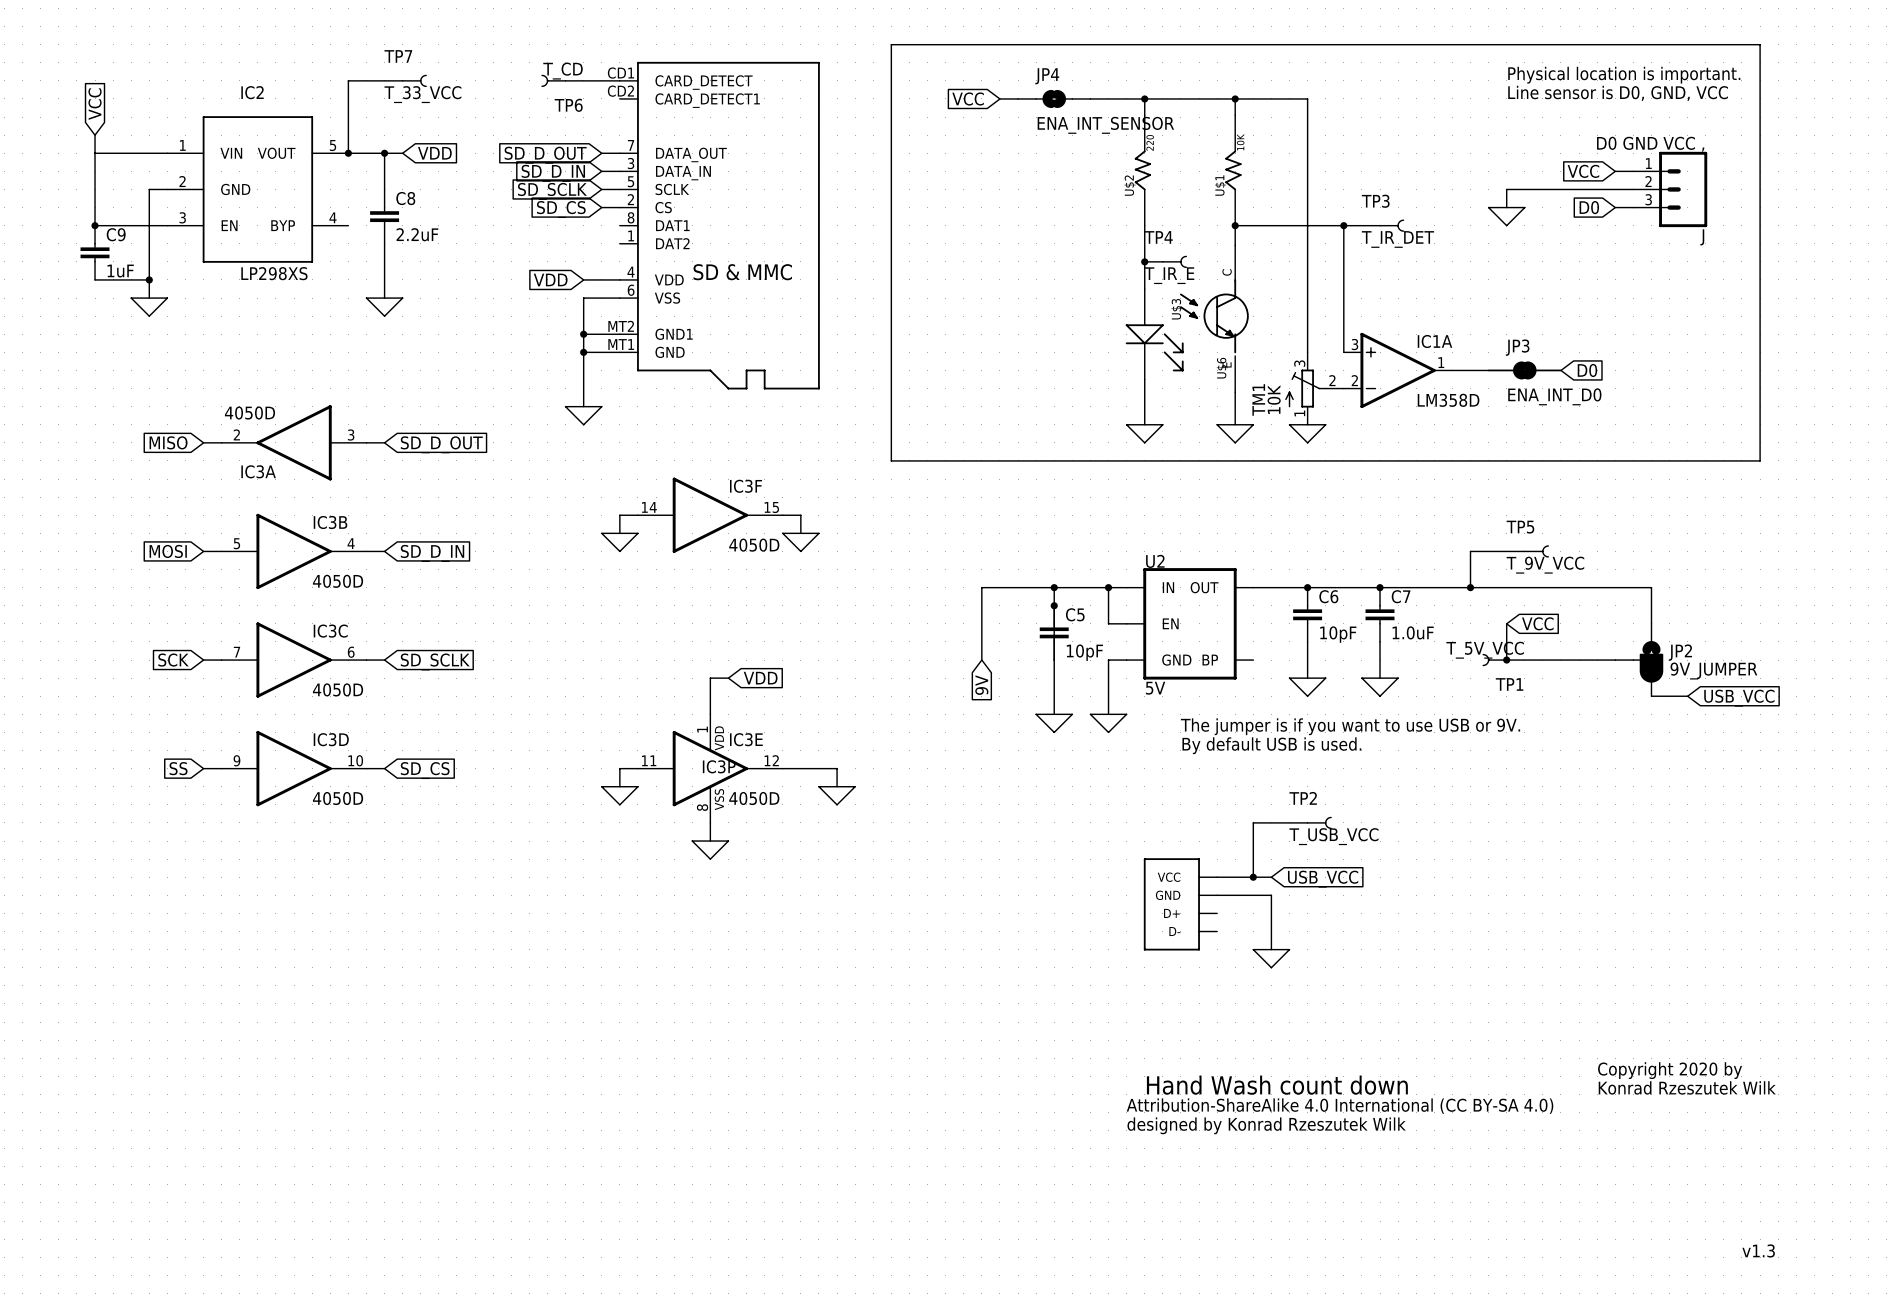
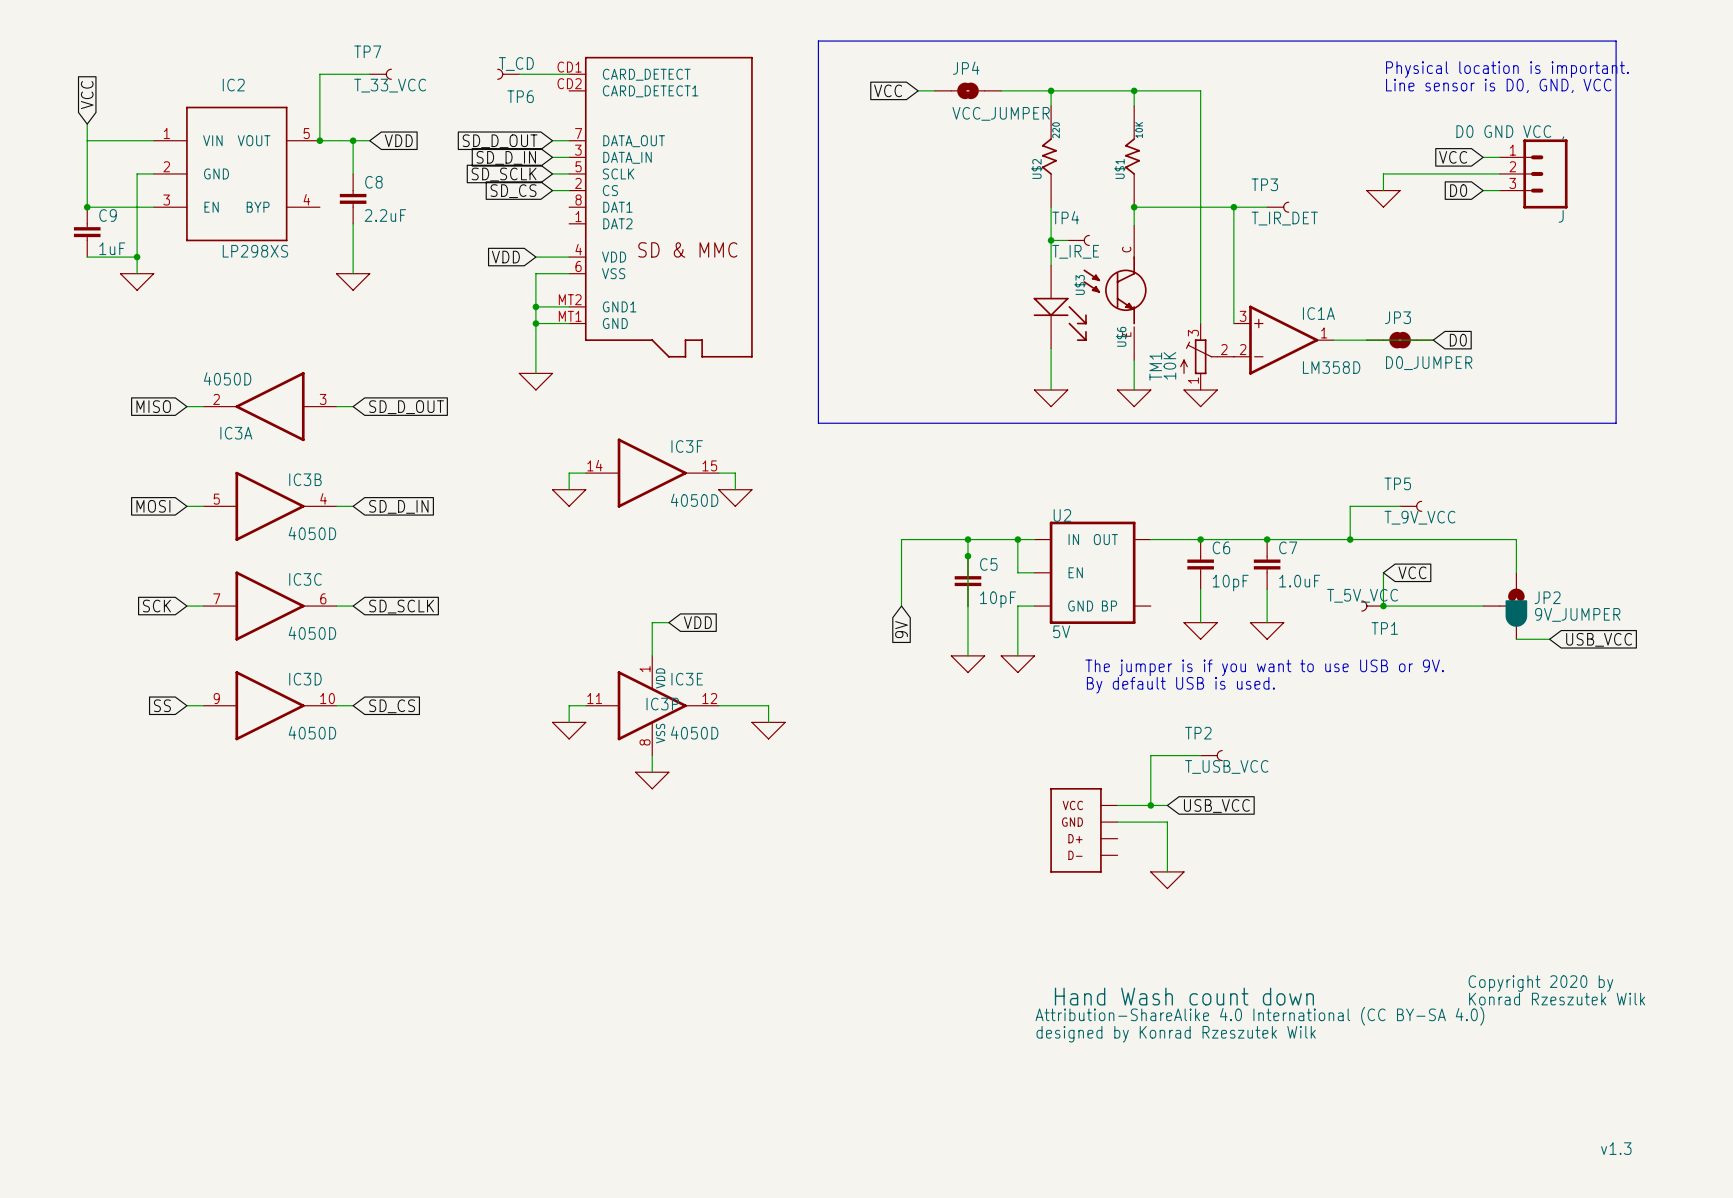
JP4 value: ENA_INT_SENSOR (1105, 125) -> VCC_JUMPER (1001, 113)
JP3 value: ENA_INT_D0 (1554, 396) -> D0_JUMPER (1429, 363)

